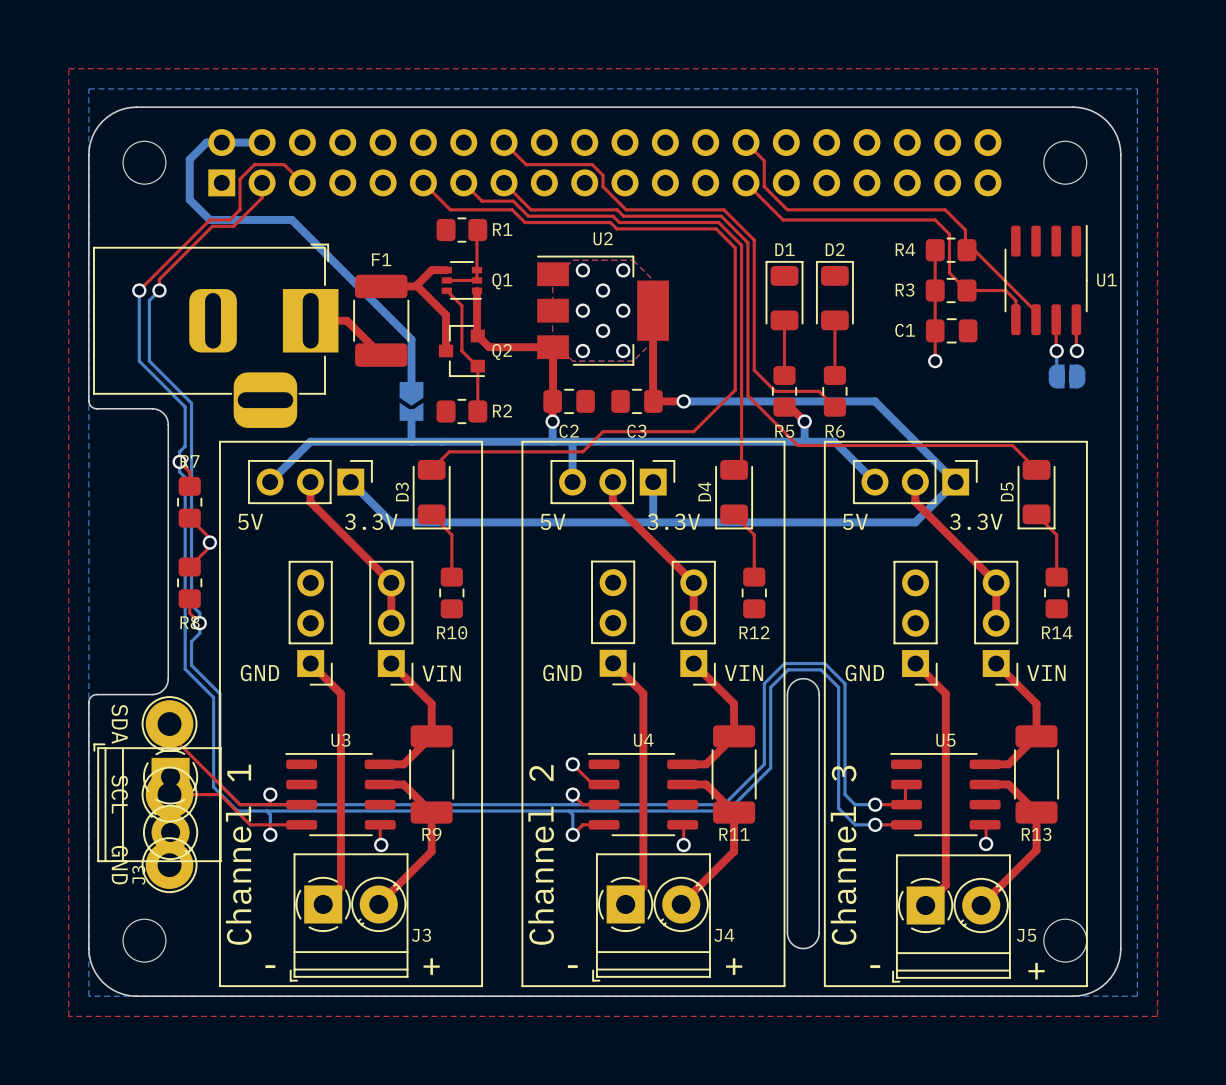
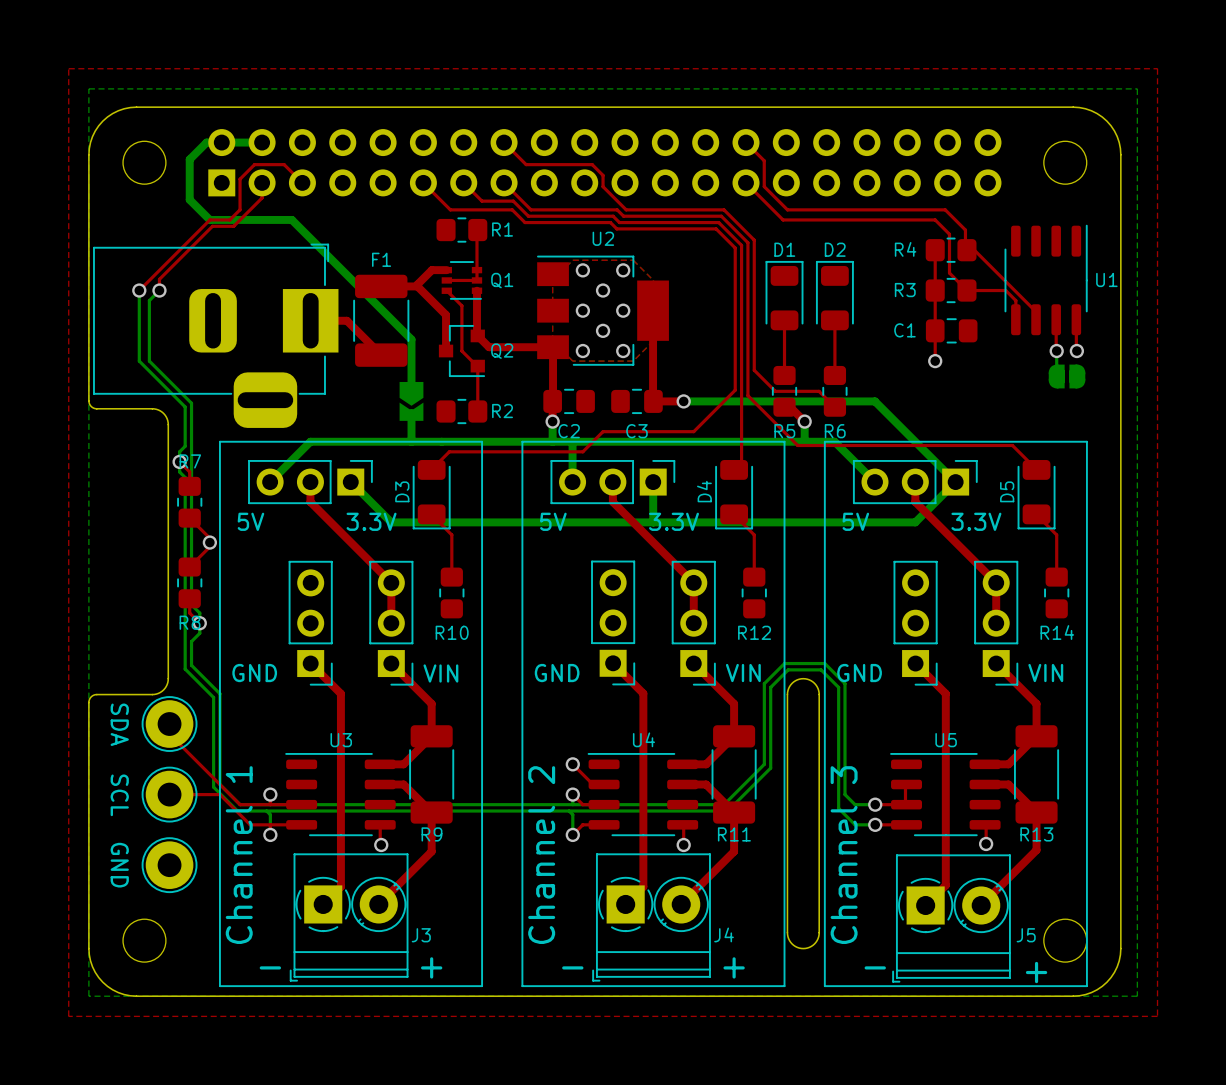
J3: (157, 802) -> none

